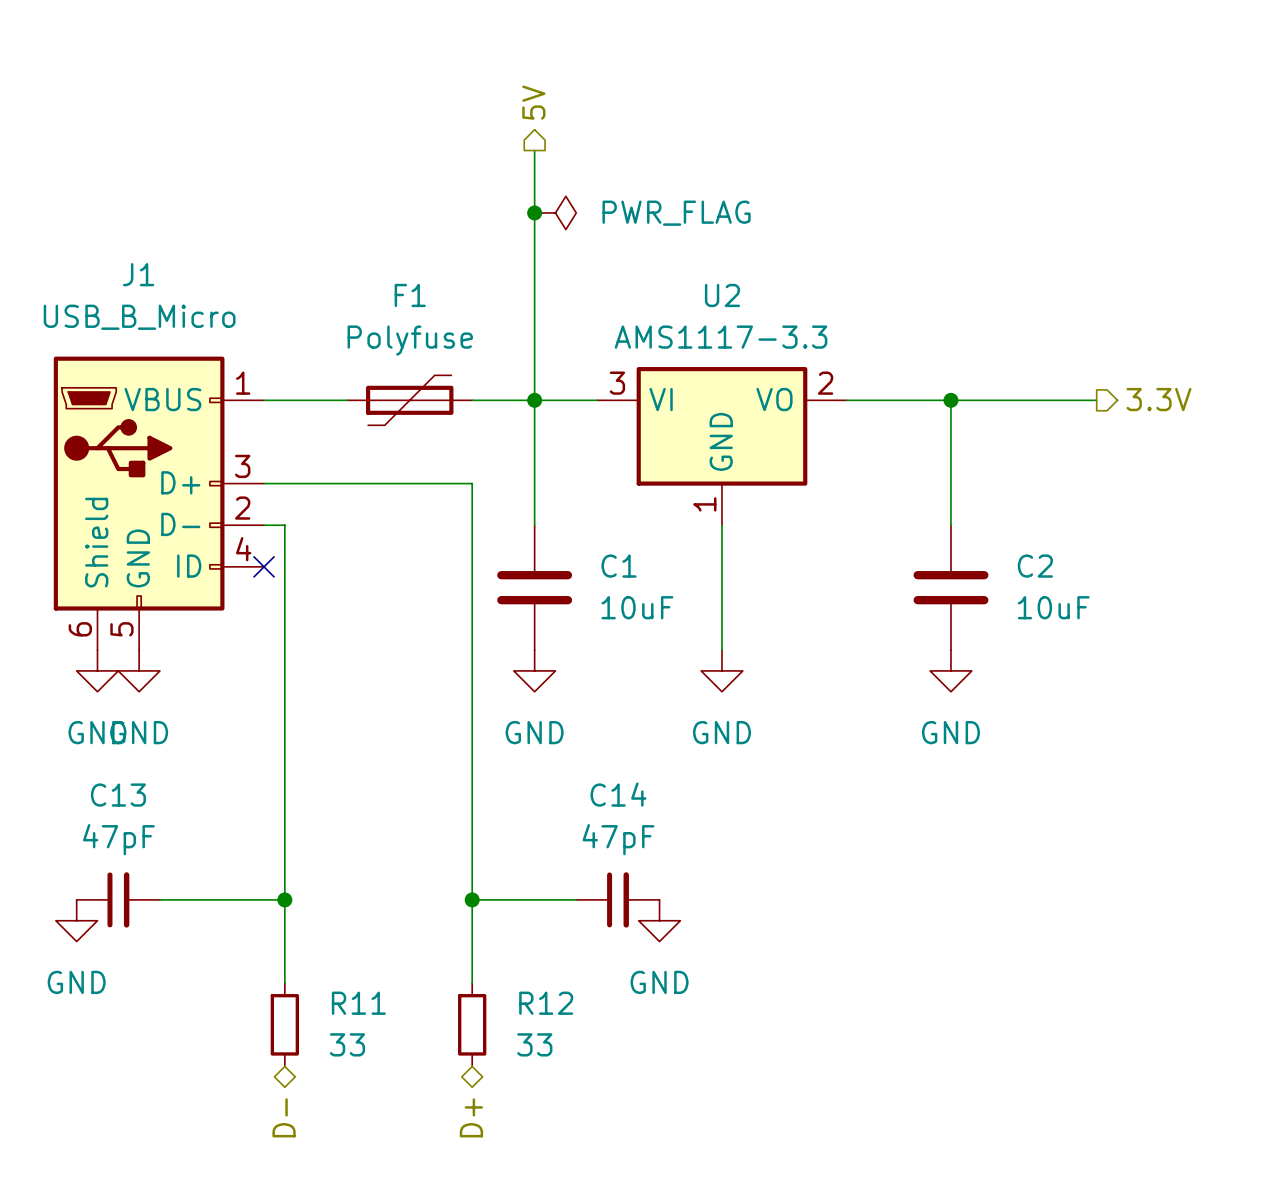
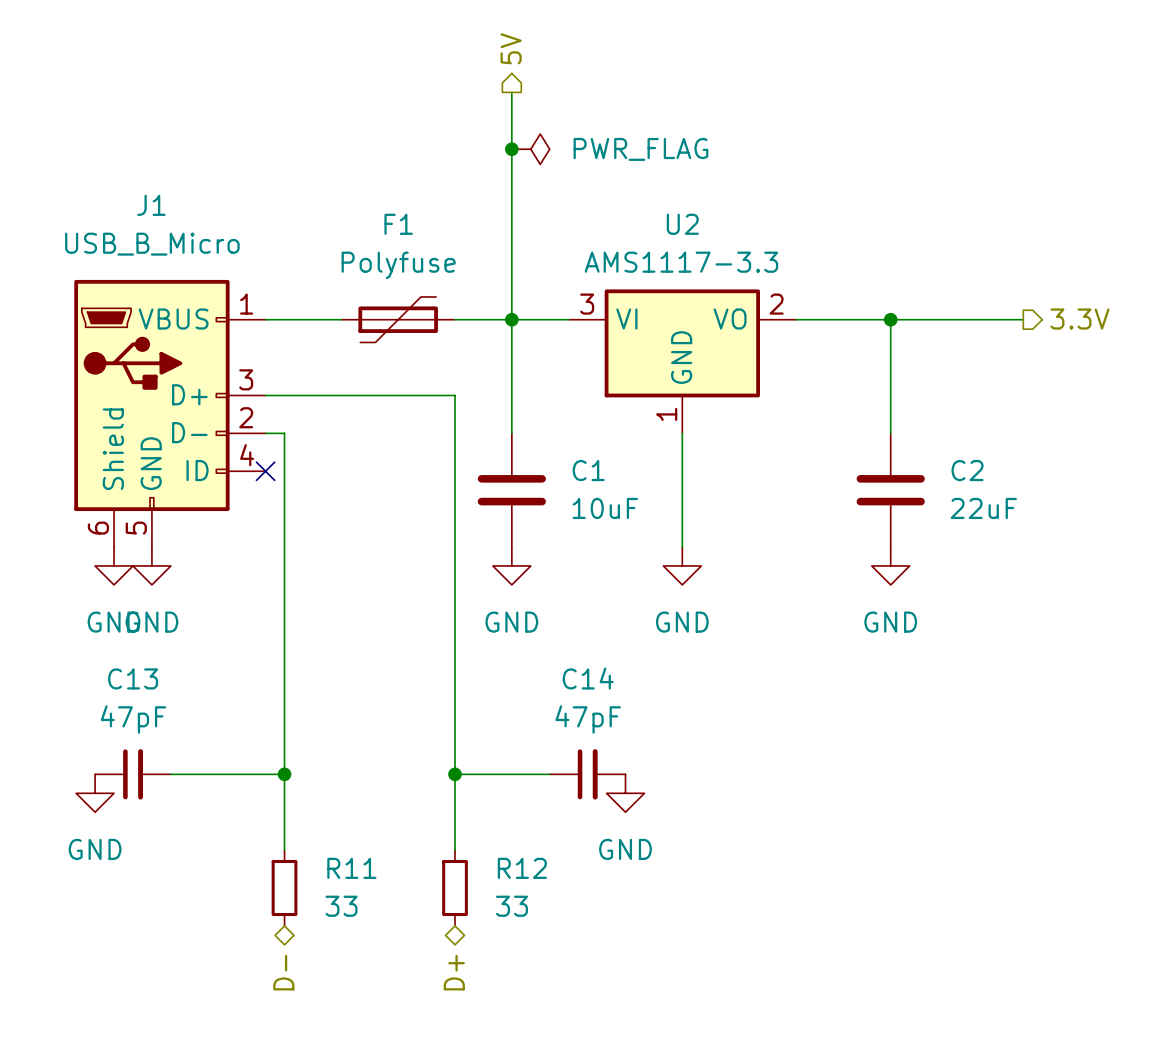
C2 value: 10uF (1053, 607) -> 22uF (983, 508)

